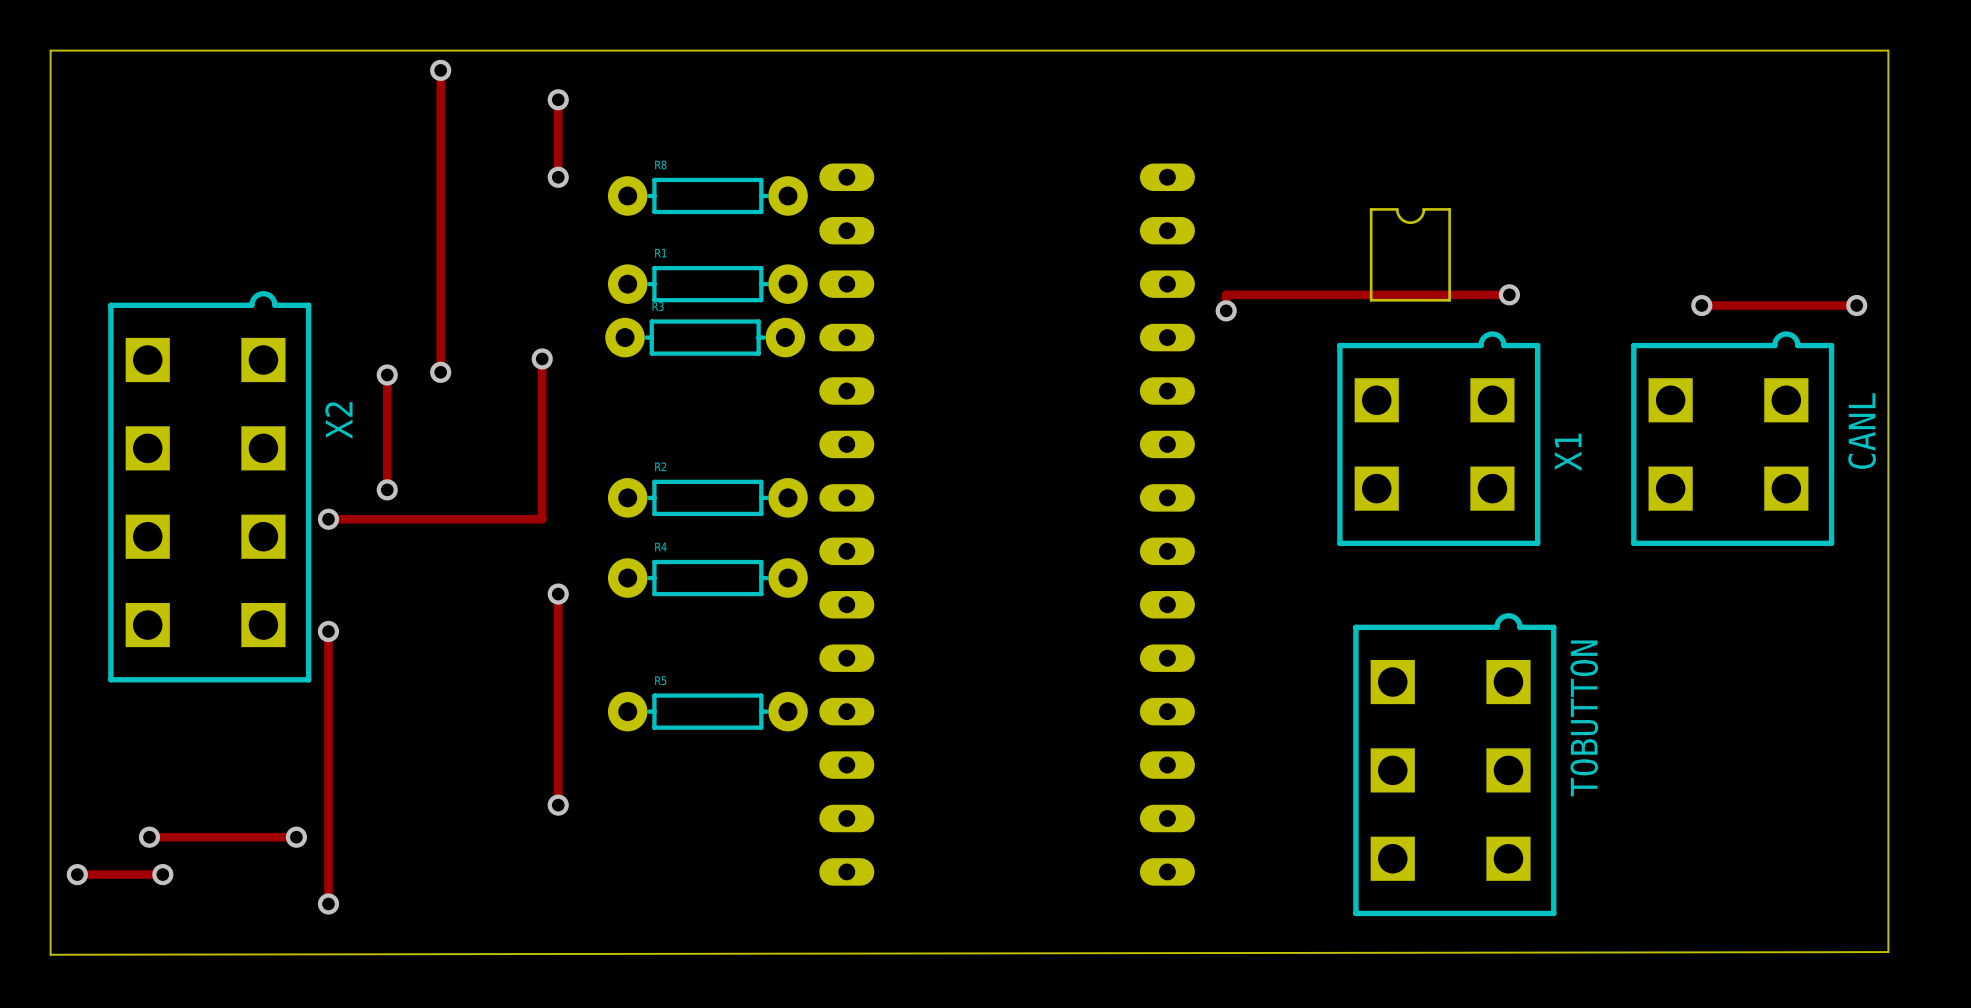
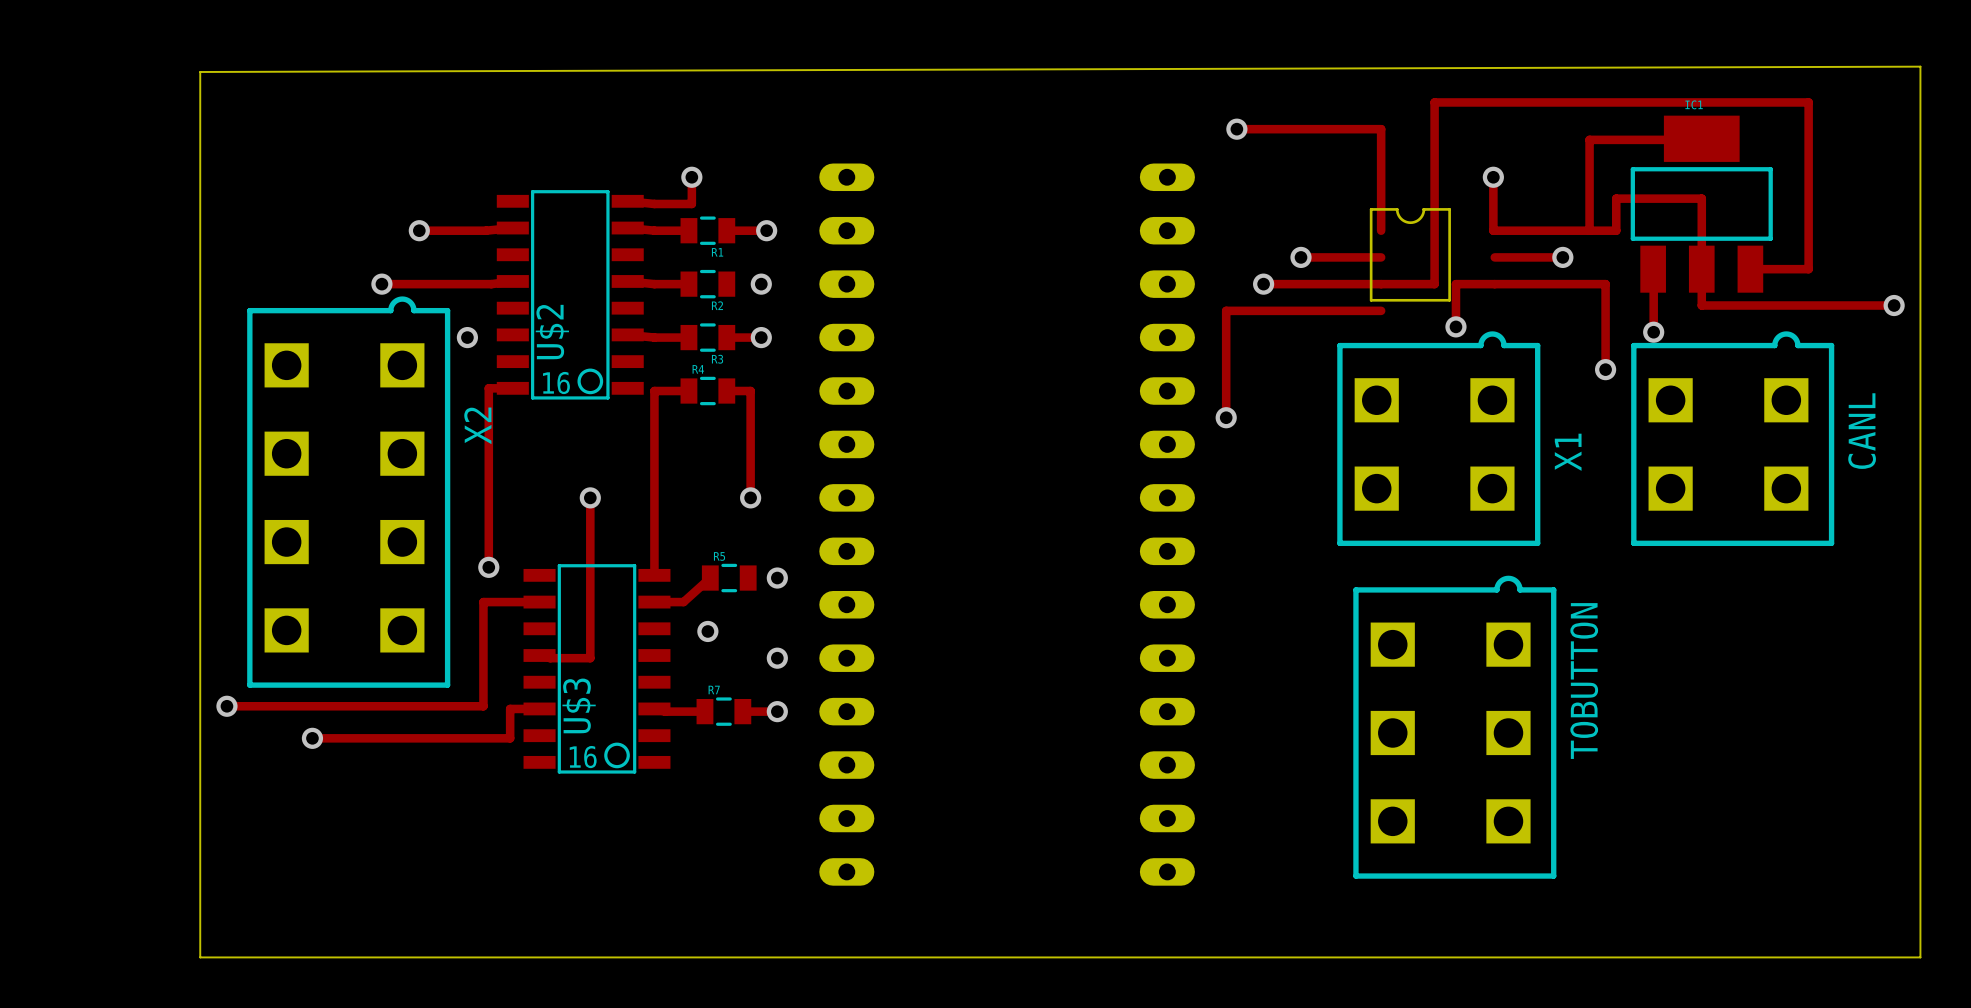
board edge: (50, 50) (1888, 50) (1888, 952) (50, 954) (50, 50) -> (1920, 66) (200, 71) (200, 957) (1920, 957) (1920, 66)
track: (440, 70) (440, 372) -> none
via: (440, 70) -> none
track: (558, 99) (558, 177) -> none
via: (558, 99) -> none
track: none -> (1236, 129) (1381, 129) (1381, 230)
via: none -> (1236, 129)
track: none -> (1701, 138) (1589, 139) (1589, 230)
via: (558, 177) -> none
track: none -> (691, 177) (691, 203) (654, 203) (627, 201)
via: none -> (691, 177)
track: none -> (1493, 177) (1493, 230) (1616, 230) (1616, 198) (1701, 198) (1701, 305)
via: none -> (1493, 177)
R8: (707, 195) -> none
IC1: none -> (1701, 204)
track: none -> (512, 228) (486, 230) (419, 230)
track: none -> (627, 228) (654, 230) (688, 230)
via: none -> (419, 230)
track: none -> (726, 230) (766, 230)
via: none -> (766, 230)
R1 name position: R1 (660, 253) -> R1 (717, 252)
track: none -> (1301, 257) (1381, 257)
via: none -> (1301, 257)
track: none -> (1494, 257) (1562, 257)
via: none -> (1562, 257)
R1 footprint: [607, 264, 808, 304] -> [680, 216, 736, 245]
track: none -> (1653, 269) (1653, 332)
track: none -> (1750, 269) (1808, 269) (1808, 102) (1434, 102) (1434, 284) (1263, 284)
track: none -> (512, 281) (491, 284) (381, 284)
track: none -> (627, 281) (654, 284) (688, 284)
via: none -> (381, 284)
via: none -> (761, 284)
via: none -> (1263, 284)
U$2: none -> (570, 294)
track: (1509, 294) (1226, 294) (1226, 310) -> none
via: (1509, 294) -> none
via position: (1701, 305) -> (1653, 332)
track: none -> (1856, 305) (1894, 305)
via position: (1856, 305) -> (1894, 305)
R3 name position: R3 (658, 306) -> R3 (717, 359)
via: (1226, 310) -> none
track: none -> (1381, 310) (1226, 310) (1226, 417)
R3 footprint: [605, 317, 806, 358] -> [680, 323, 736, 352]
track: none -> (1455, 326) (1455, 284) (1605, 284) (1605, 369)
via: none -> (1455, 326)
track: none -> (627, 334) (654, 337) (688, 337)
via: none -> (467, 337)
track: none -> (726, 337) (761, 337)
via: none -> (761, 337)
track: (542, 358) (542, 519) (328, 519) -> none
via: (542, 358) -> none
via: none -> (1605, 369)
via: (440, 372) -> none
track: (387, 374) (387, 489) -> none
via: (387, 374) -> none
track: none -> (512, 388) (488, 388) (488, 567)
track: none -> (691, 391) (654, 391) (654, 575)
track: none -> (726, 391) (750, 391) (750, 497)
via: none -> (1226, 417)
R2 name position: R2 (660, 466) -> R2 (717, 305)
R2 footprint: [607, 478, 808, 518] -> [680, 269, 736, 299]
X2 position: (209, 486) -> (348, 492)
via: (387, 489) -> none
track: none -> (590, 497) (590, 658) (550, 658) (539, 655)
via: none -> (590, 497)
via: none -> (750, 497)
via: (328, 519) -> none
R4 footprint: [607, 558, 808, 598] -> [680, 376, 736, 406]
via: none -> (488, 567)
track: none -> (710, 578) (683, 602) (654, 602)
via: none -> (777, 578)
track: (558, 594) (558, 805) -> none
via: (558, 594) -> none
track: none -> (539, 602) (483, 602) (483, 706) (226, 706)
track: (328, 631) (328, 903) -> none
via: (328, 631) -> none
via: none -> (707, 631)
via: none -> (777, 658)
U$3: none -> (596, 668)
R5 footprint: [607, 691, 808, 732] -> [701, 563, 757, 593]
via: none -> (226, 706)
track: none -> (539, 708) (510, 708) (510, 738) (312, 738)
track: none -> (654, 708) (665, 711) (704, 711)
R7: none -> (723, 711)
track: none -> (742, 711) (777, 711)
via: none -> (777, 711)
via: none -> (312, 738)
TOBUTTON position: (1454, 764) -> (1454, 727)
via: (558, 805) -> none
track: (149, 837) (296, 837) -> none
via: (149, 837) -> none
via: (296, 837) -> none
track: (77, 874) (162, 874) -> none
via: (77, 874) -> none
via: (162, 874) -> none
via: (328, 903) -> none

